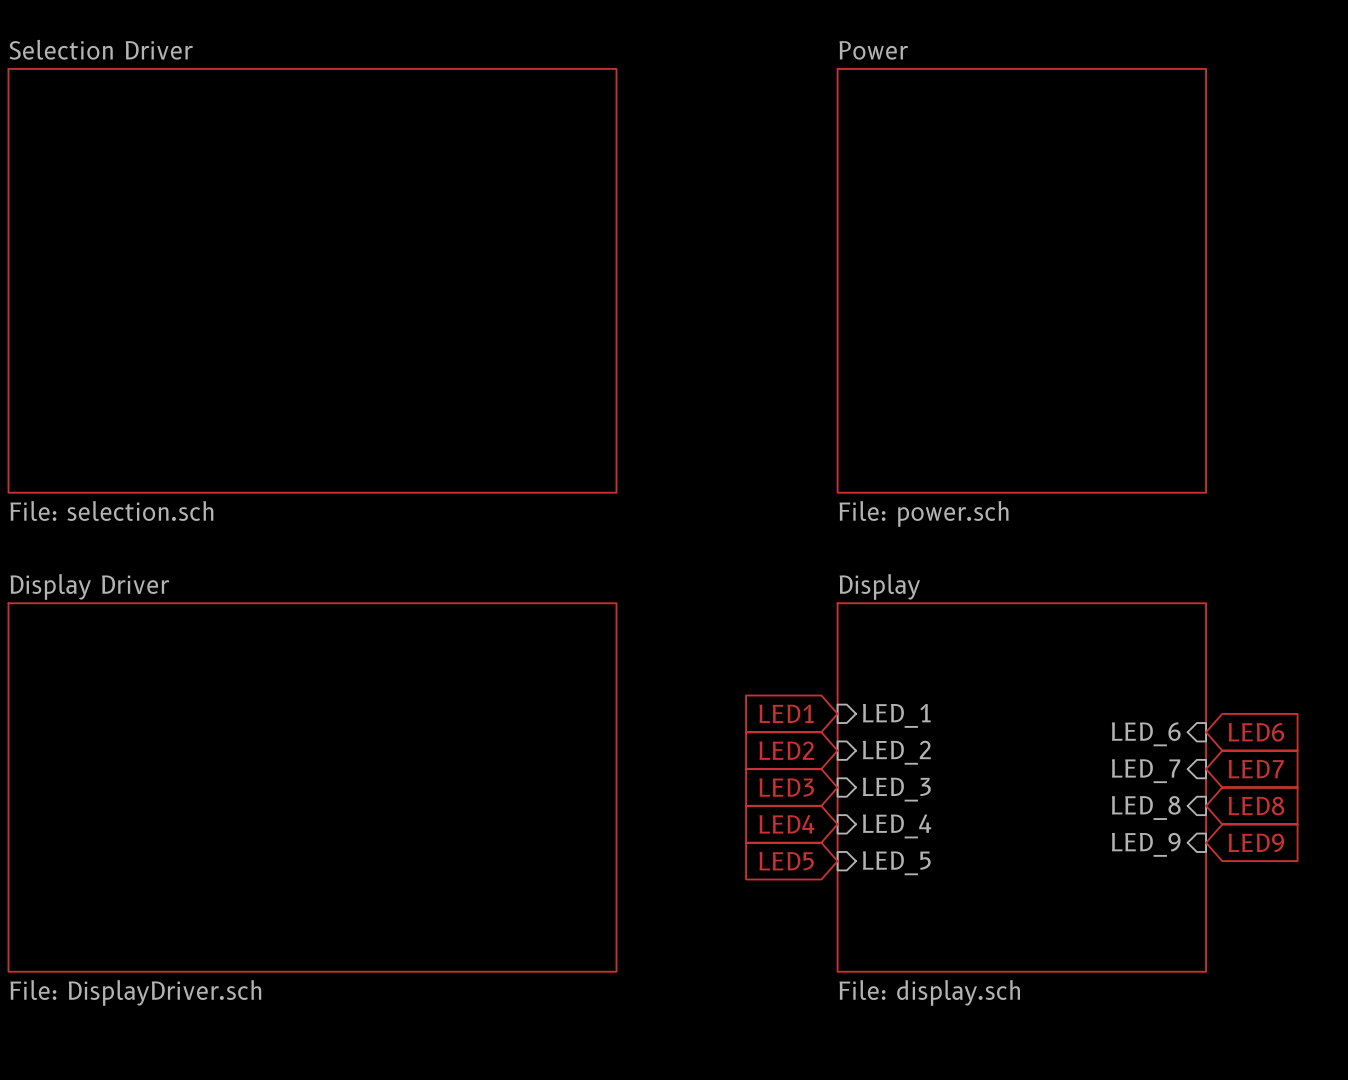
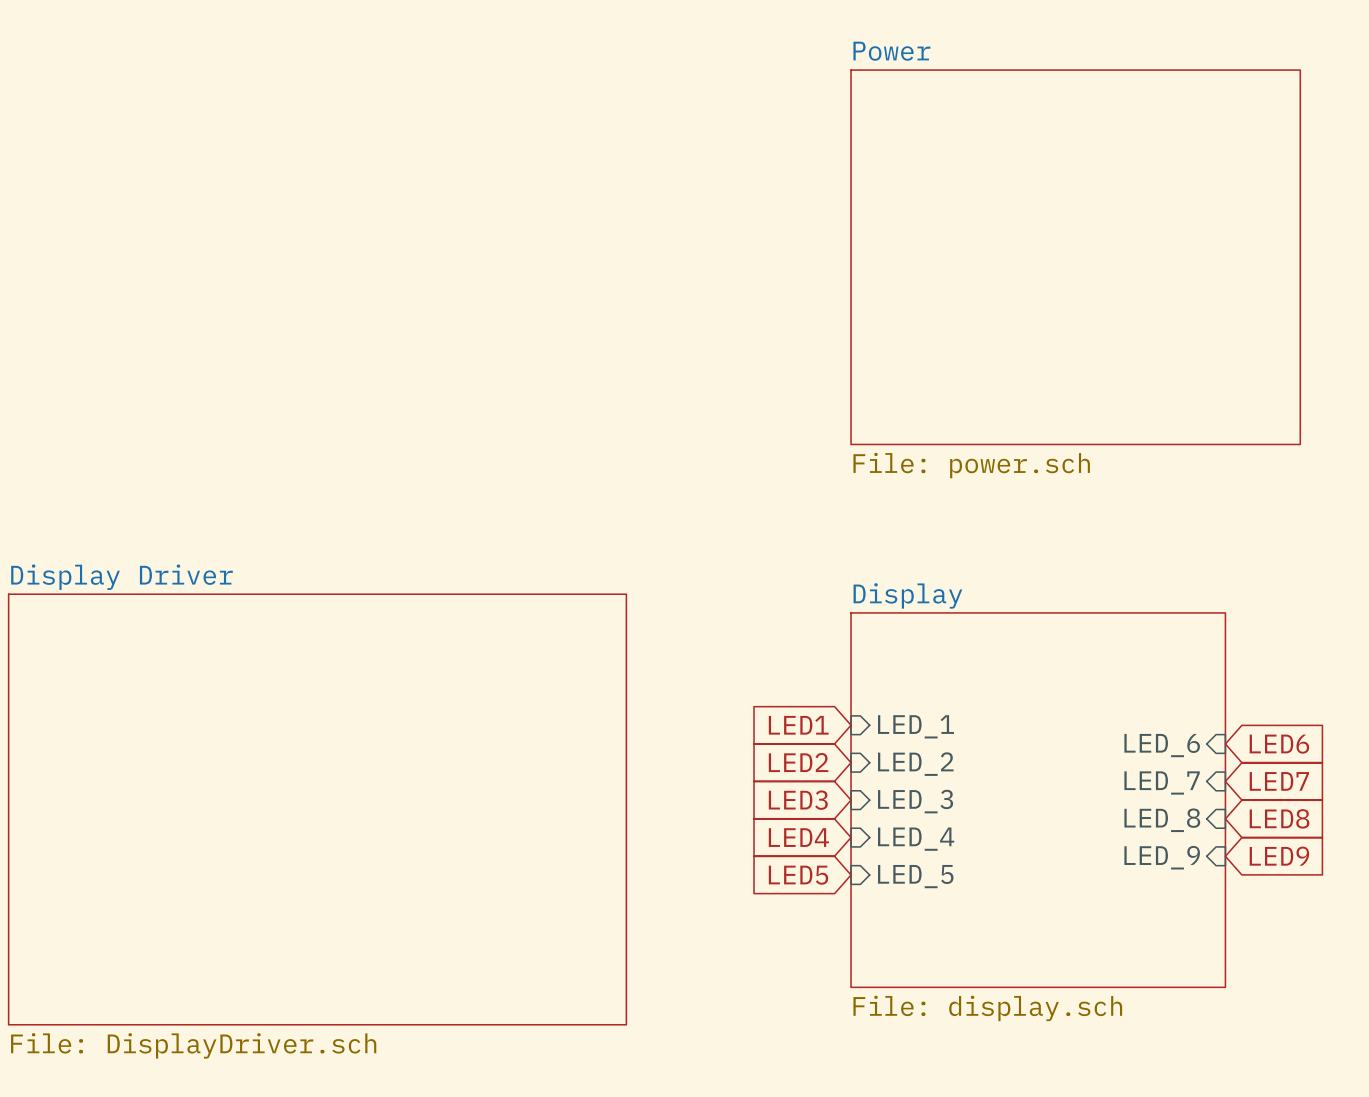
sheet Power: none -> File: power.sch (1075, 257)
sheet Selection Driver: File: selection.sch (312, 280) -> none
sheet Power: File: power.sch (1021, 280) -> none
sheet Display Driver shape: [8, 603, 617, 972] -> [8, 594, 627, 1025]

